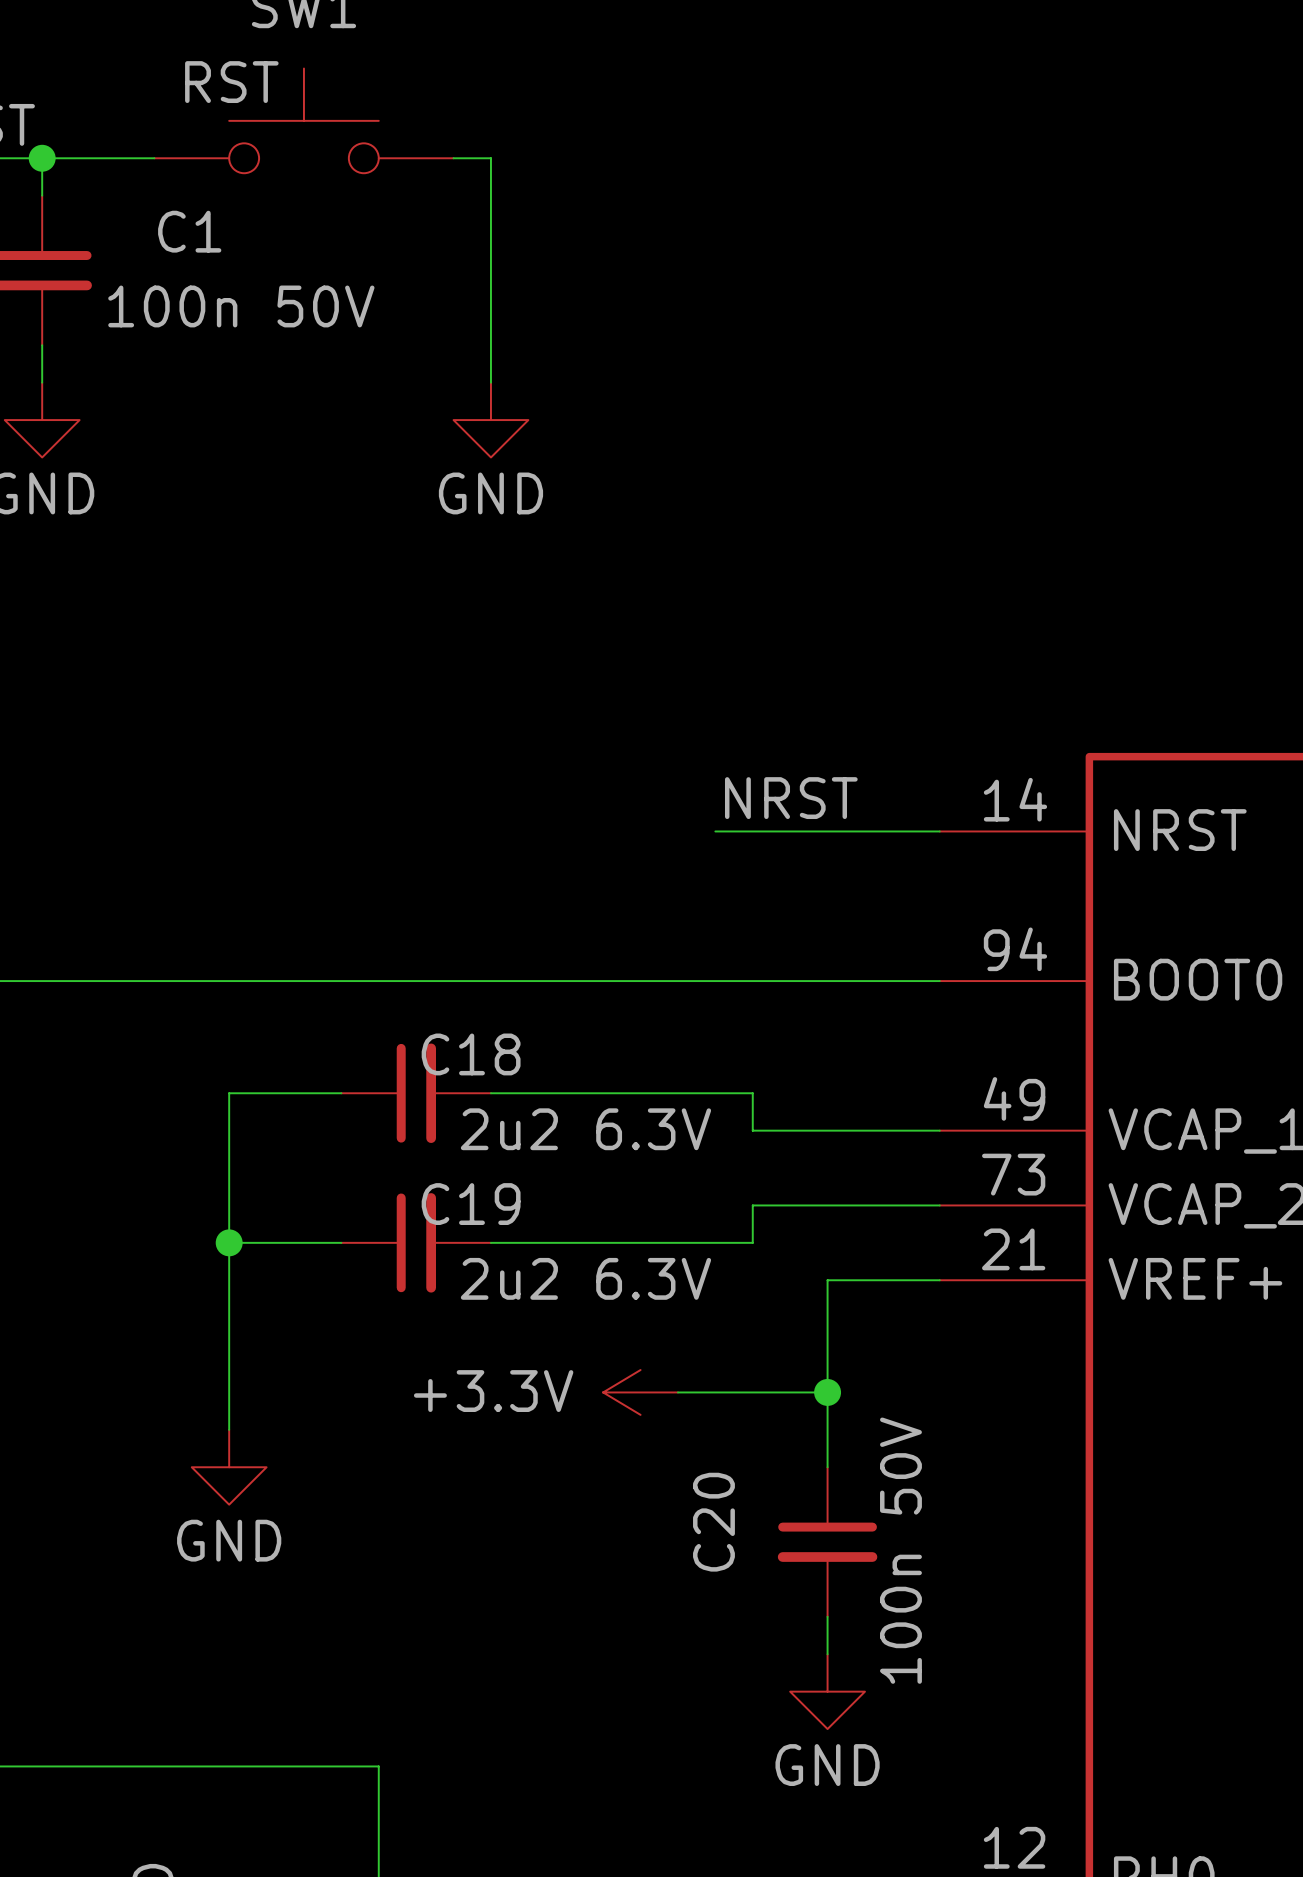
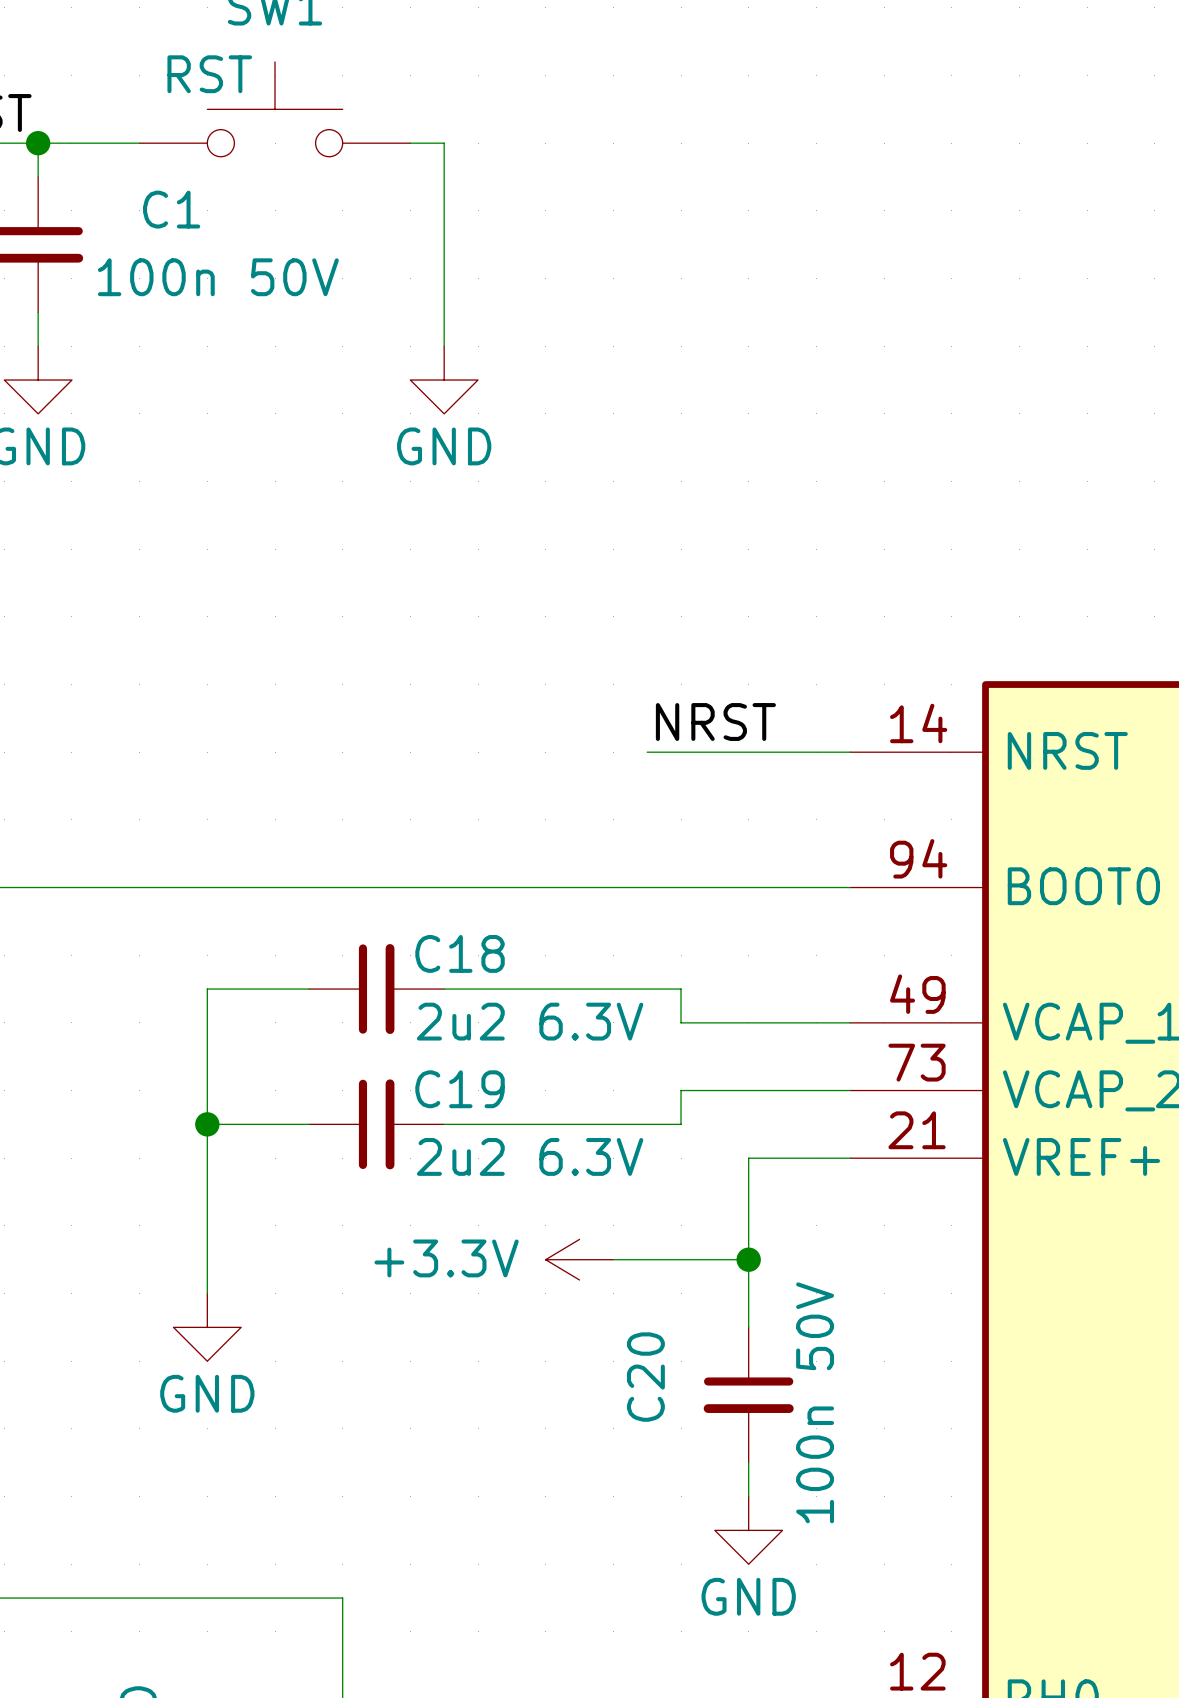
C18 name position: C18 (471, 1054) -> C18 (460, 953)
C19 name position: C19 (471, 1204) -> C19 (460, 1089)

